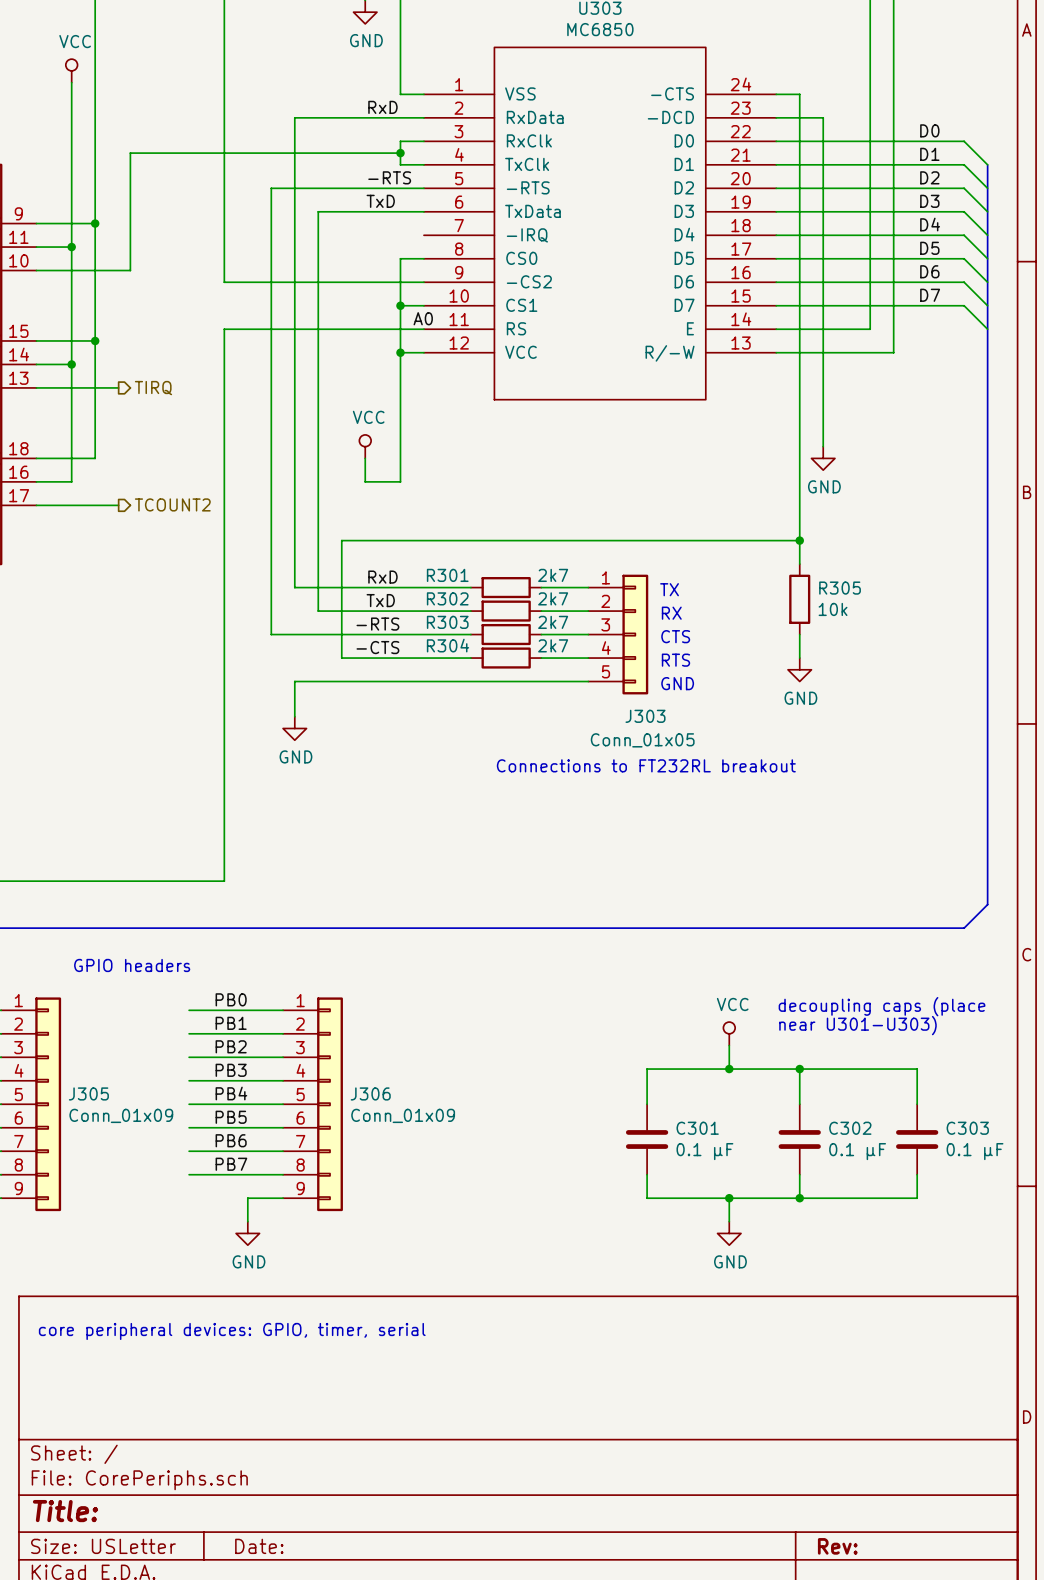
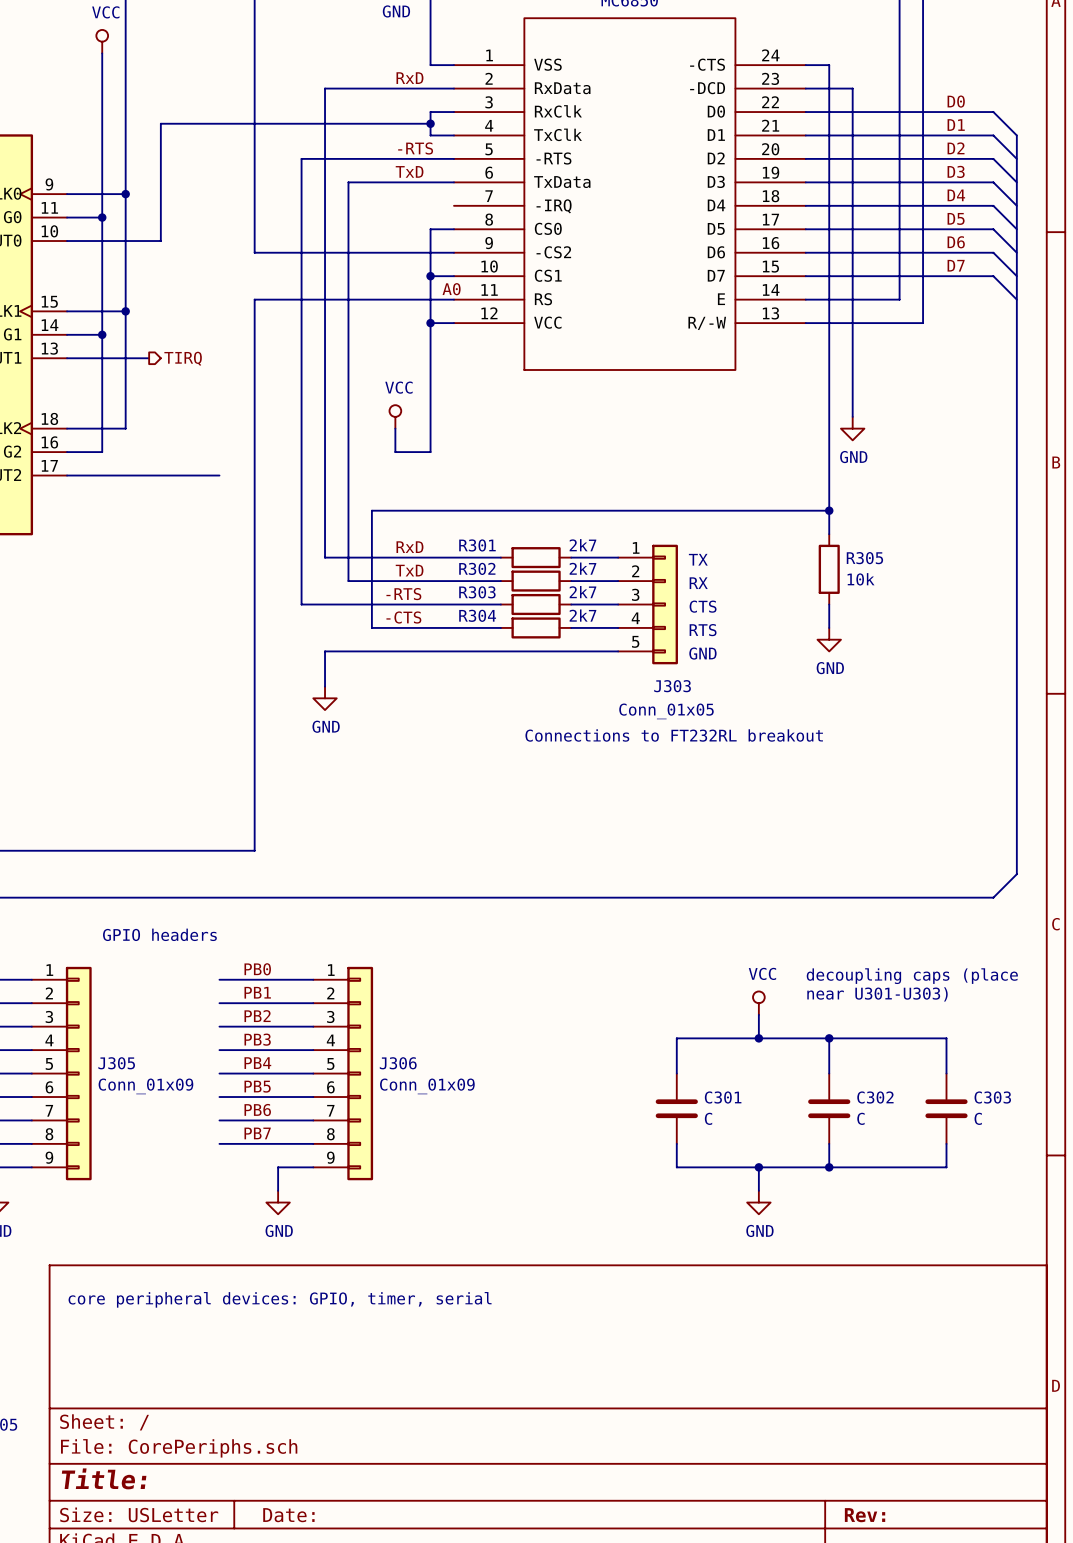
hierarchical label: TCOUNT2 (172, 504) -> none
wire: none -> (149, 475) (219, 475)
C301 value: 0.1 μF (704, 1151) -> C (708, 1118)
C302 value: 0.1 μF (857, 1151) -> C (860, 1118)
C303 value: 0.1 μF (975, 1151) -> C (978, 1118)

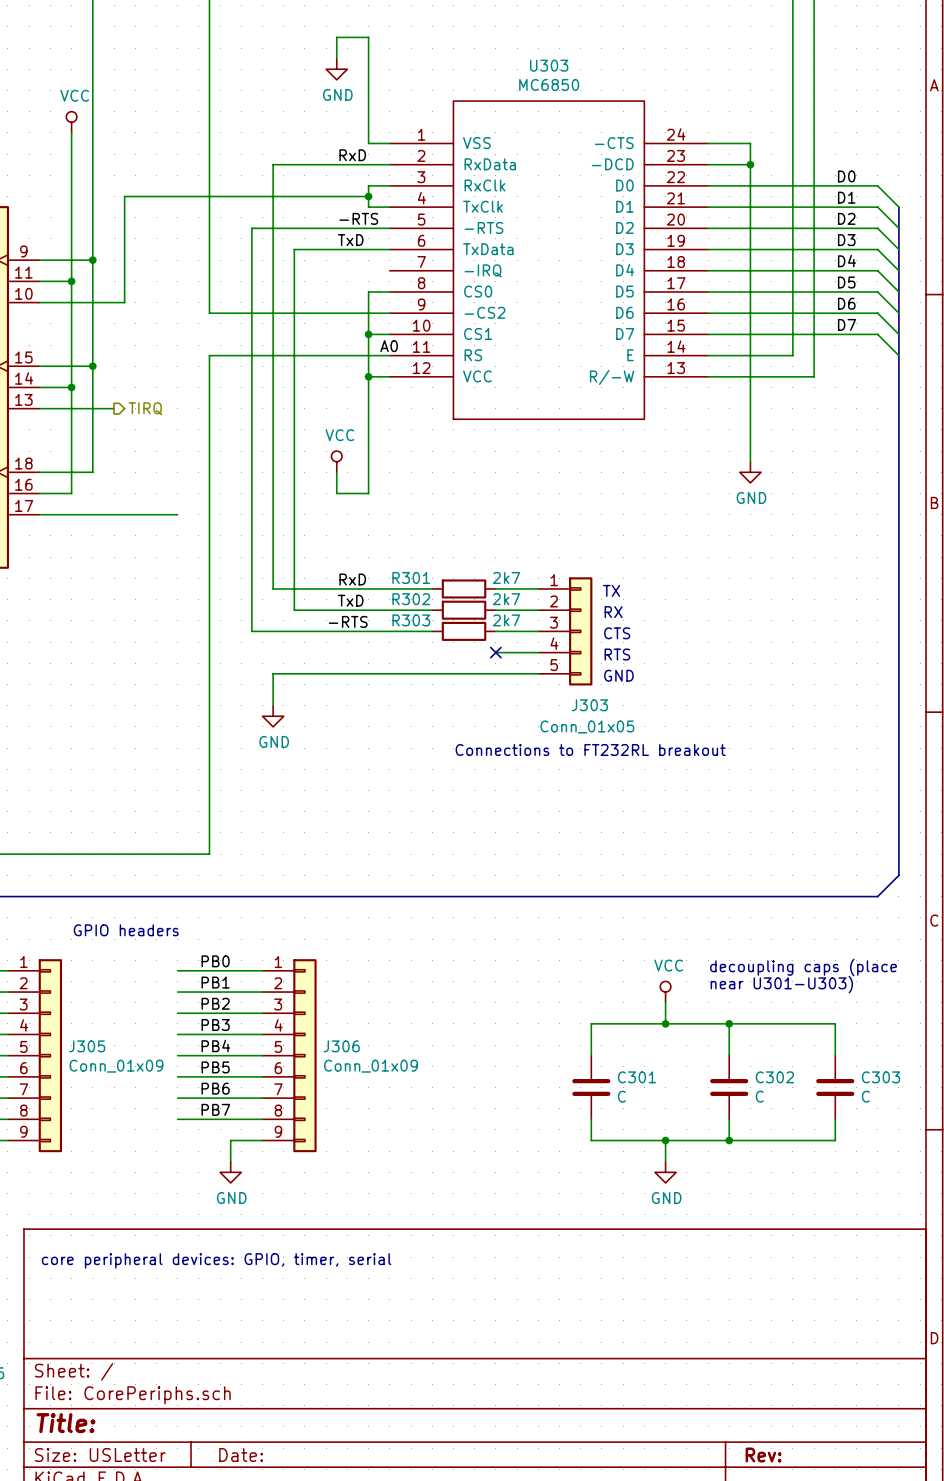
wire: (829, 65) (829, 534) -> (729, 143) (750, 143) (750, 164)
junction: none -> (750, 164)
wire: (829, 510) (371, 510) (371, 627) (500, 627) -> none
junction: (829, 510) -> none
R305: 10k (829, 569) -> none
wire: (829, 604) (829, 627) -> none
label: -CTS (403, 617) -> none
R304: 2k7 (536, 627) -> none
no-connect mark: none -> (495, 652)
power symbol: GND (829, 639) -> none

